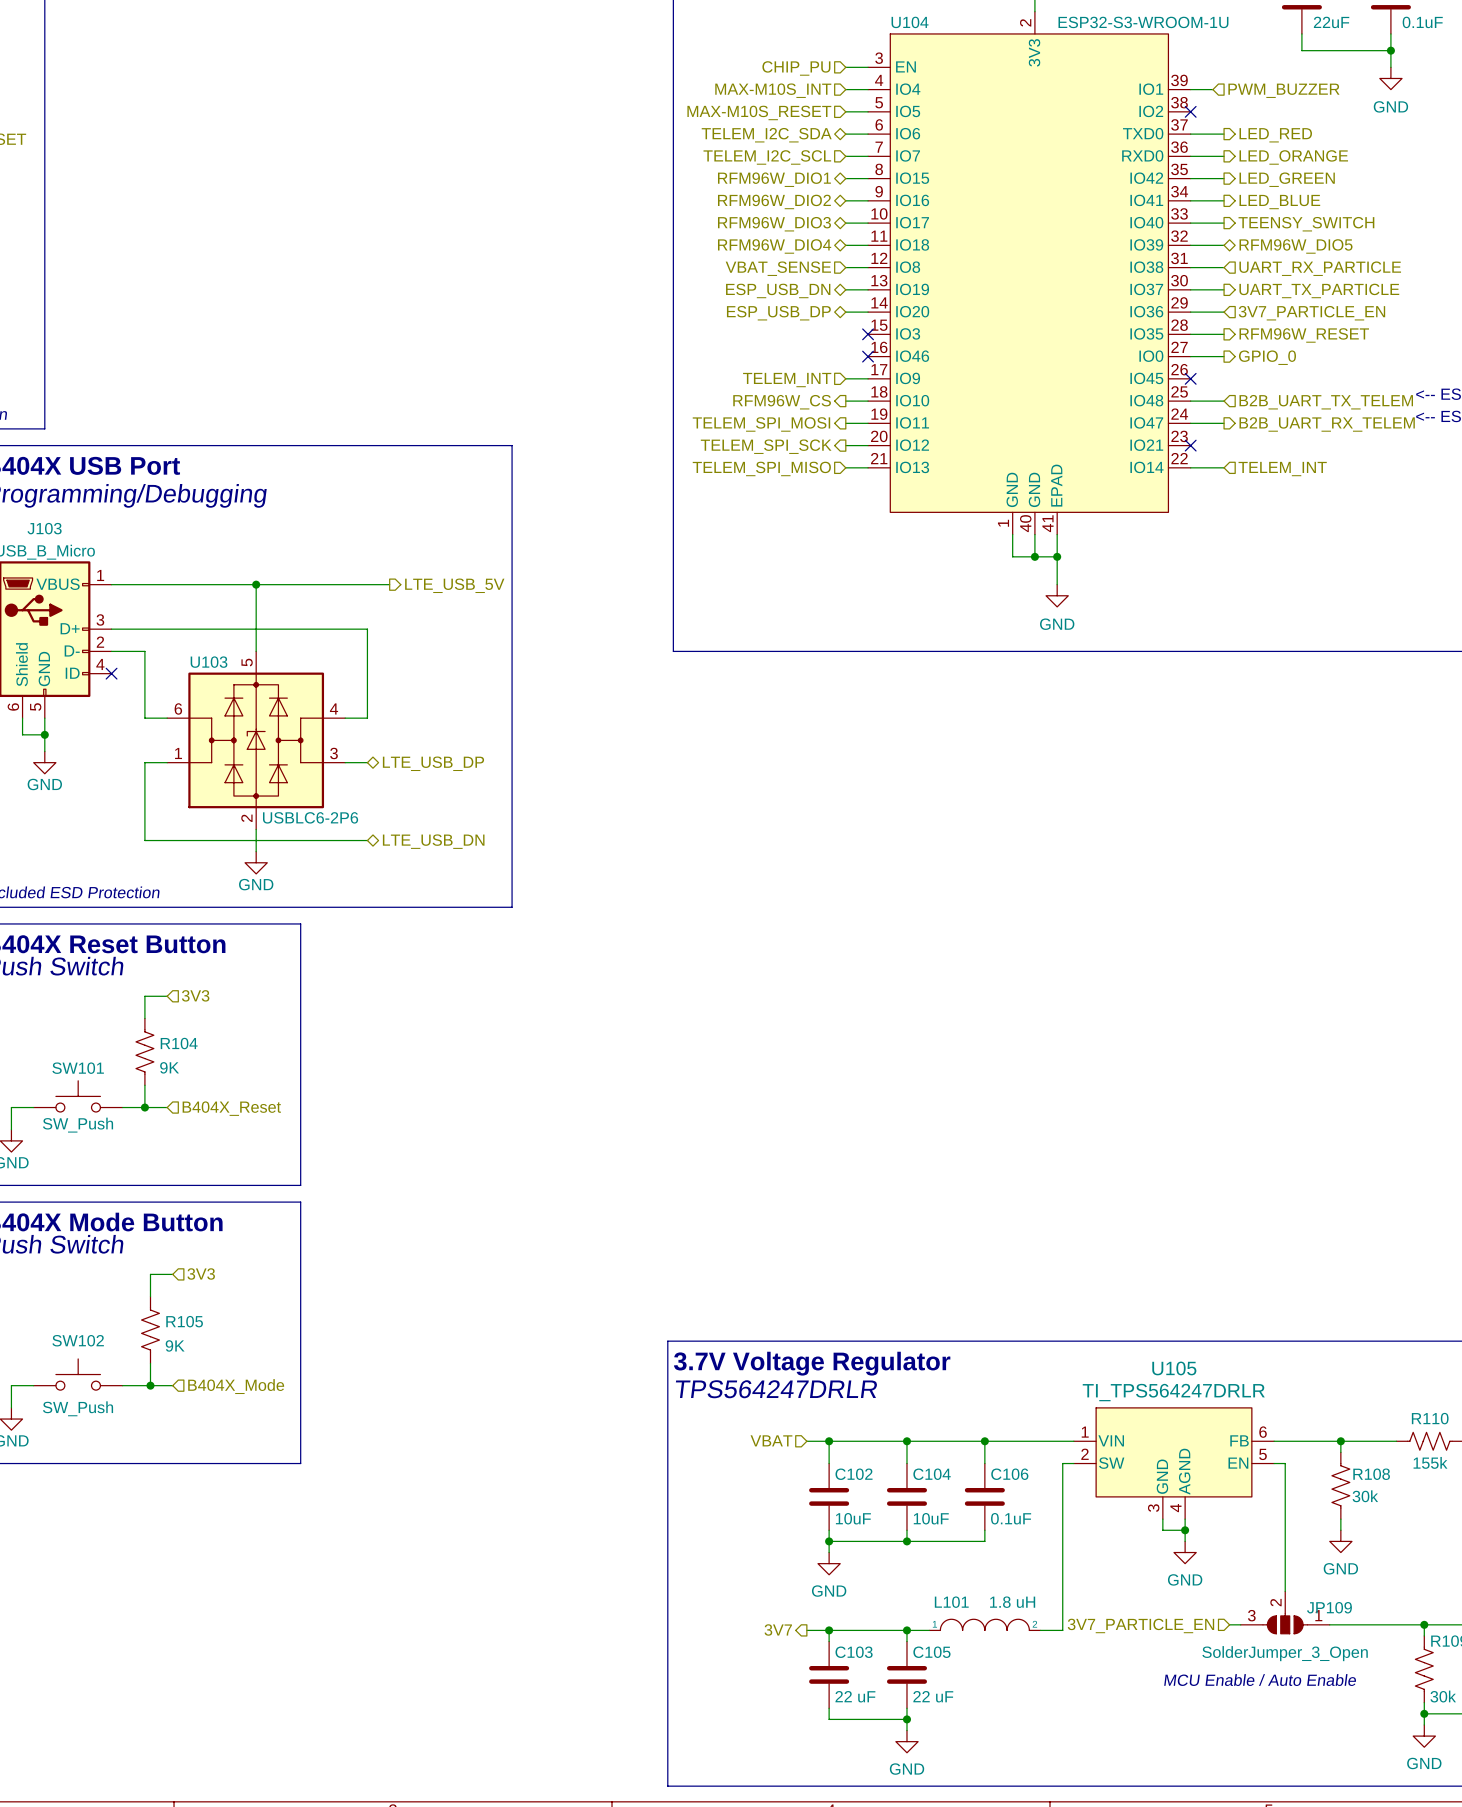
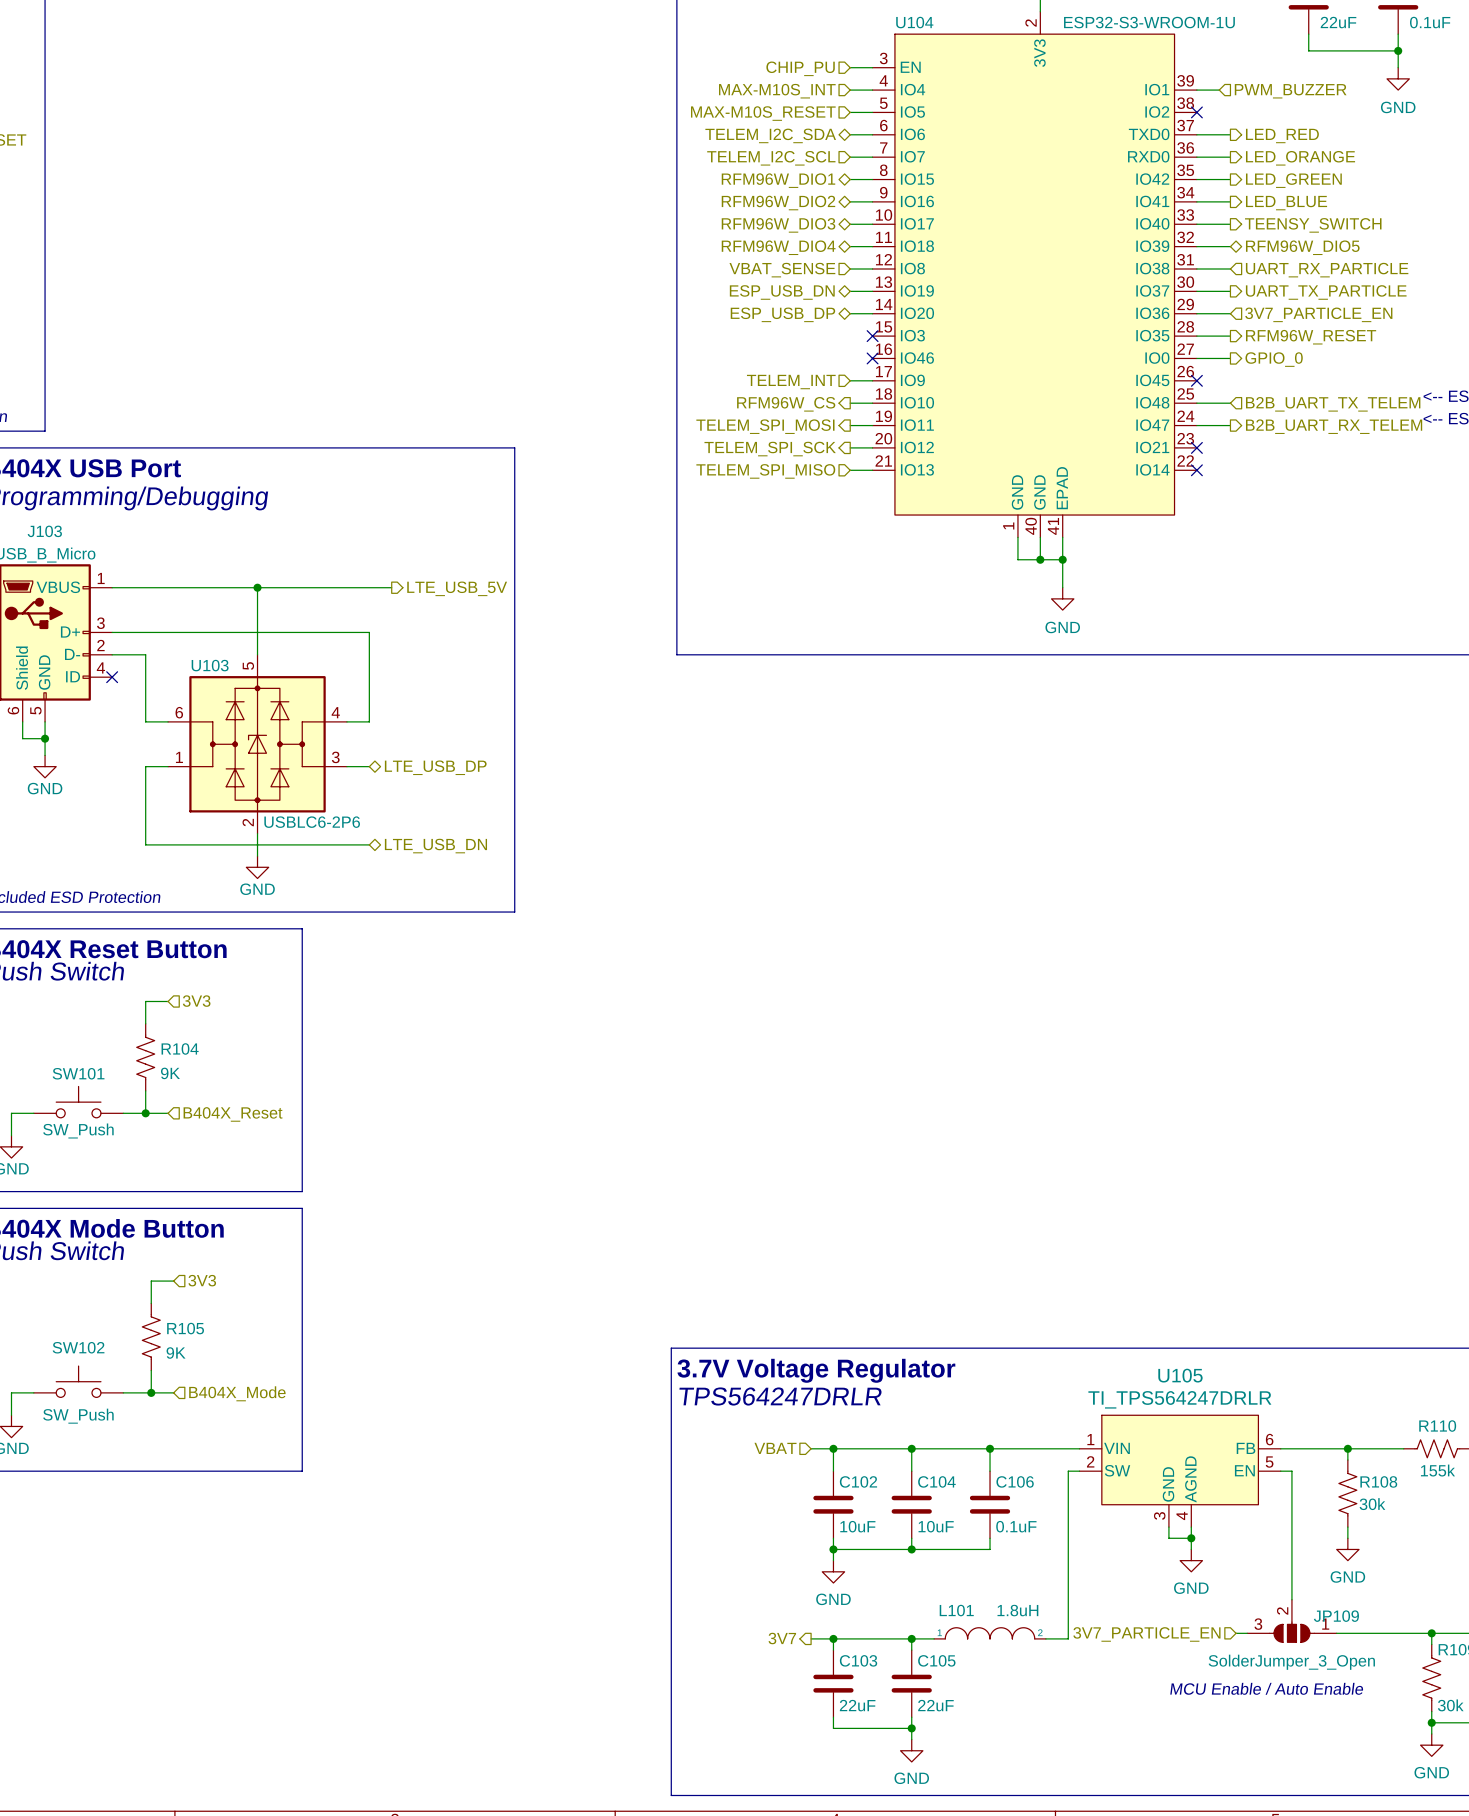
wire: (1190, 467) (1224, 467) -> none
no-connect mark: none -> (1196, 470)
hierarchical label: TELEM_INT (1282, 469) -> none
L101 value: 1.8 uH (1012, 1602) -> 1.8uH (1017, 1610)
C103 value: 22 uF (855, 1696) -> 22uF (857, 1705)
C105 value: 22 uF (933, 1696) -> 22uF (935, 1705)

